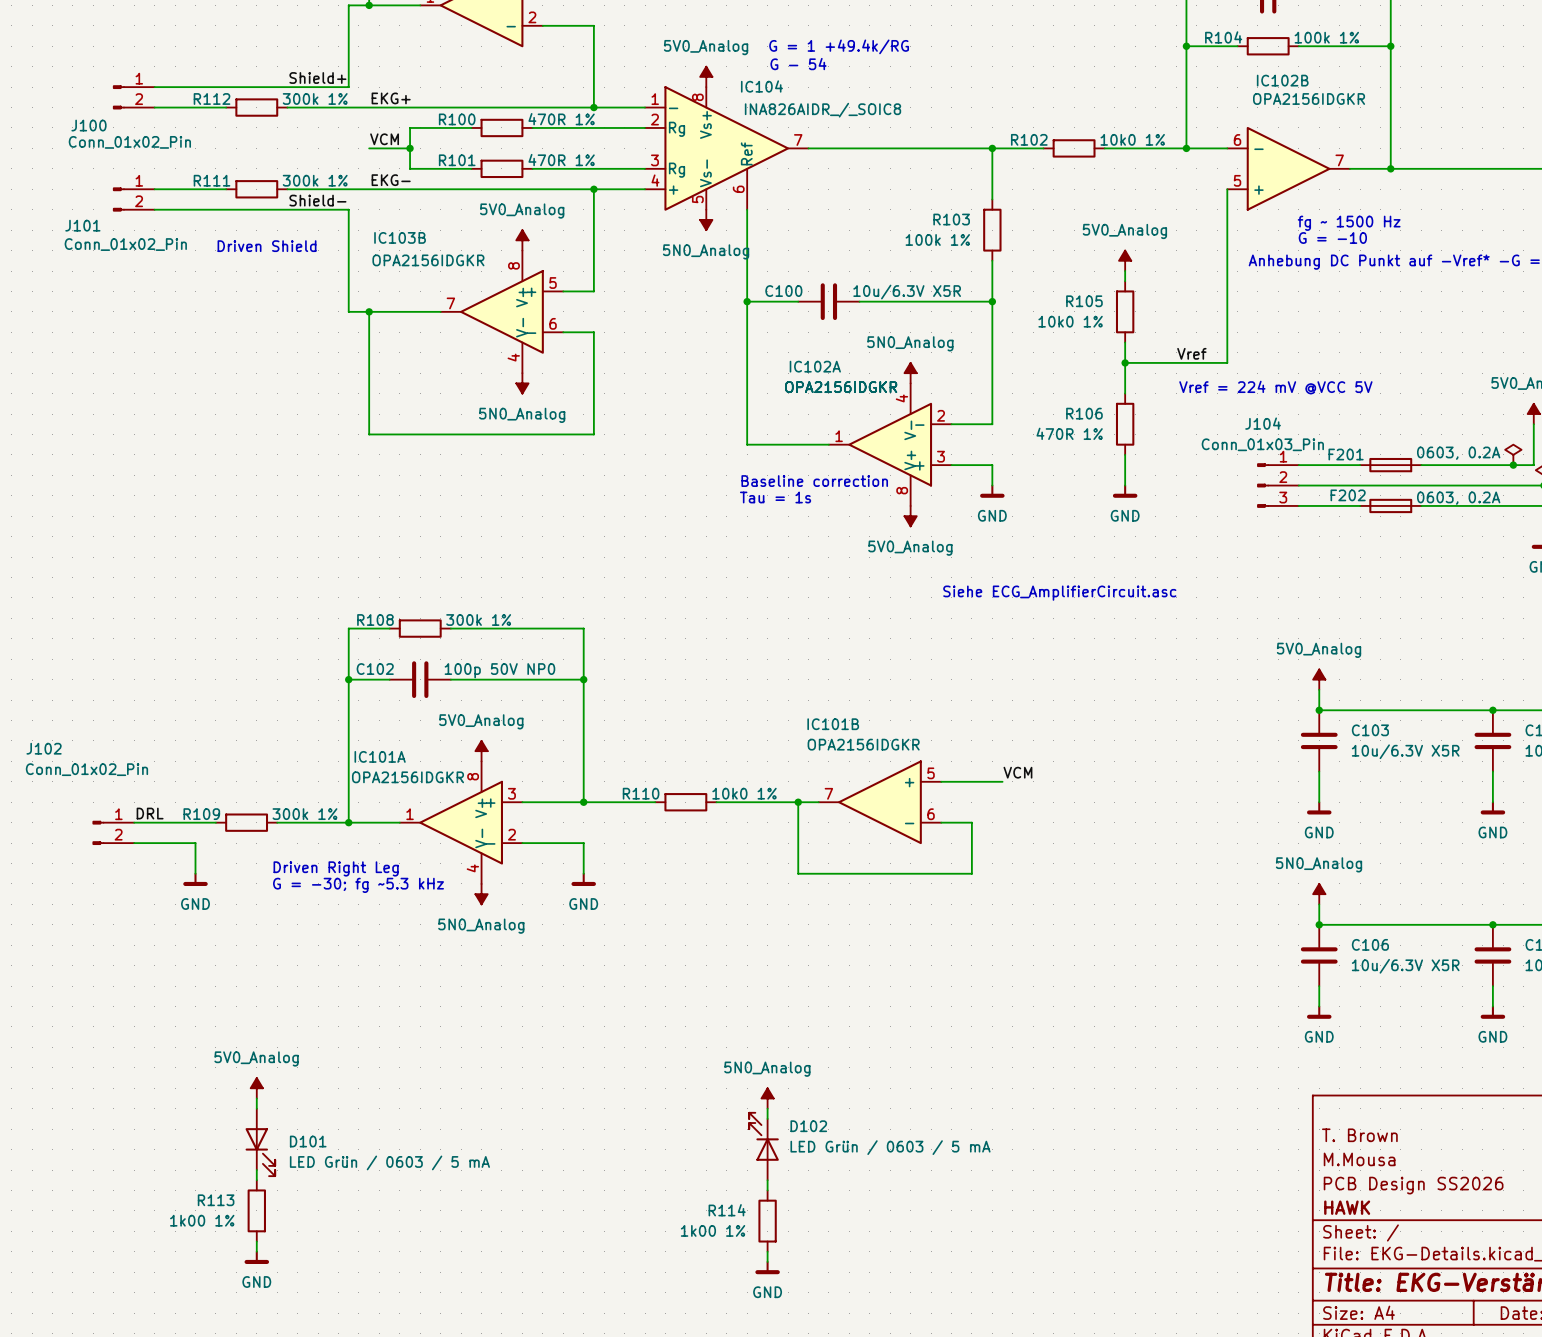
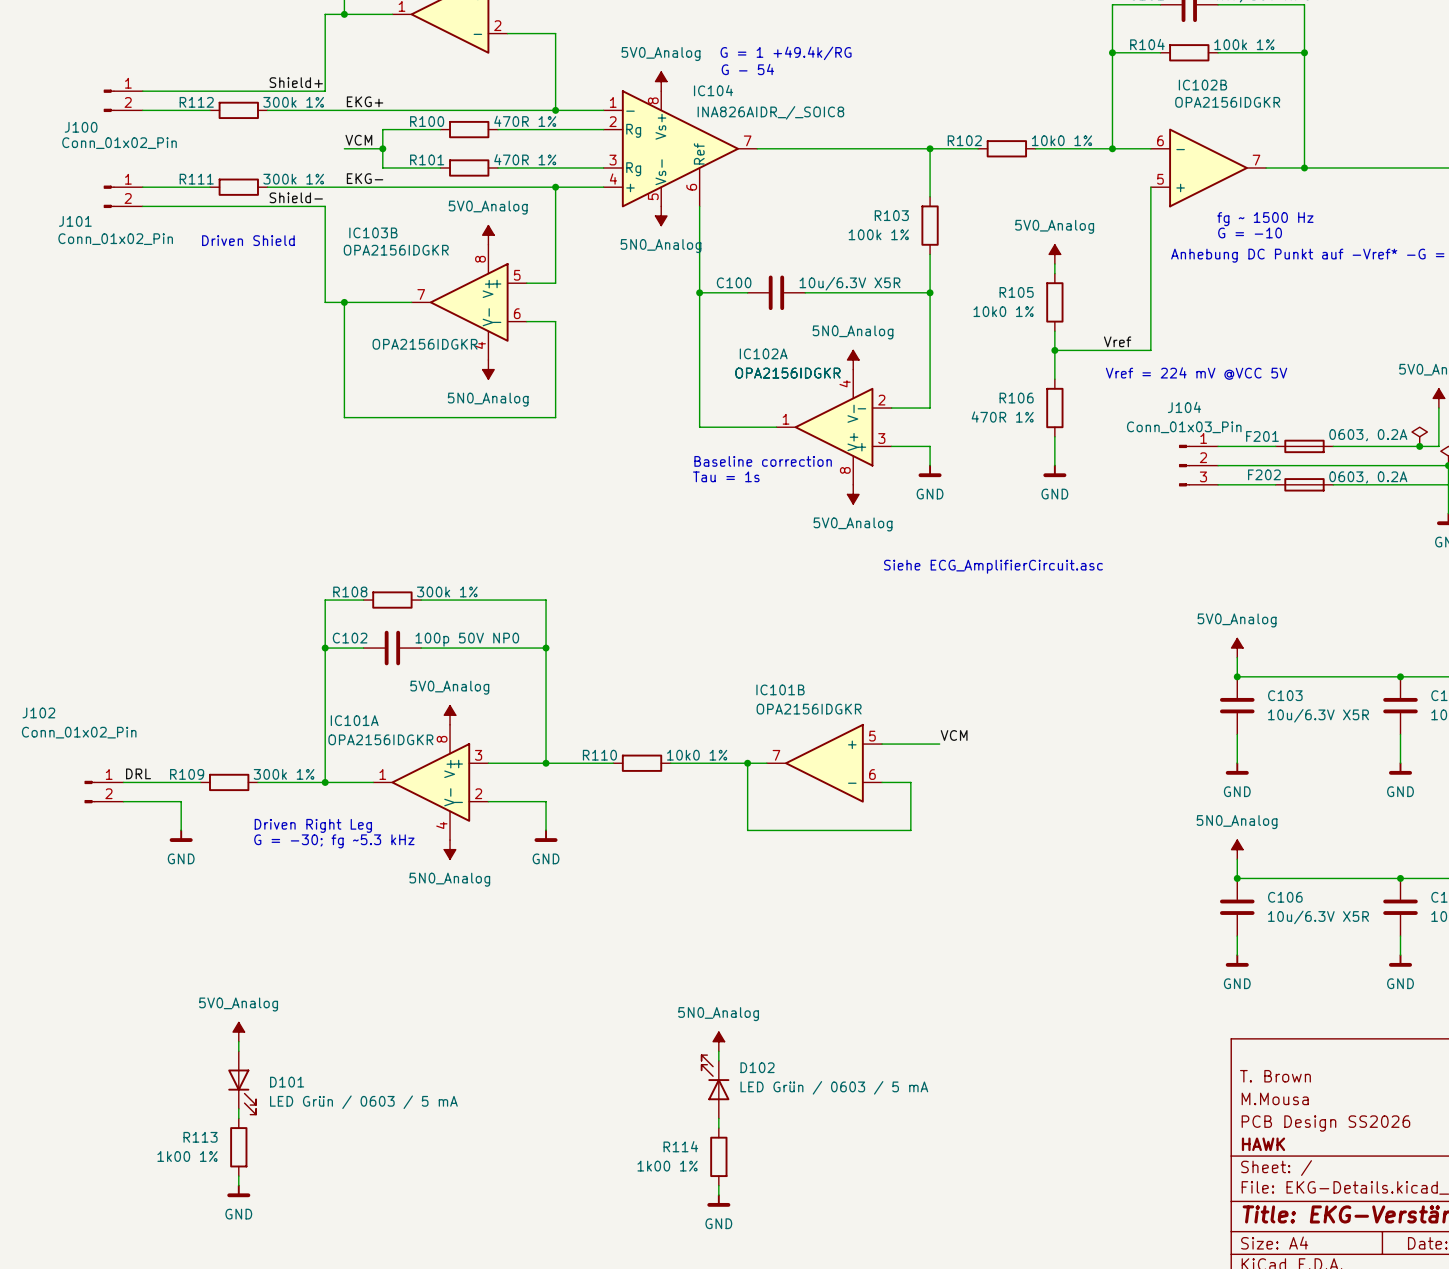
part value: none -> OPA2156IDGKR (396, 250)
IC103B value position: OPA2156IDGKR (428, 260) -> OPA2156IDGKR (425, 344)

